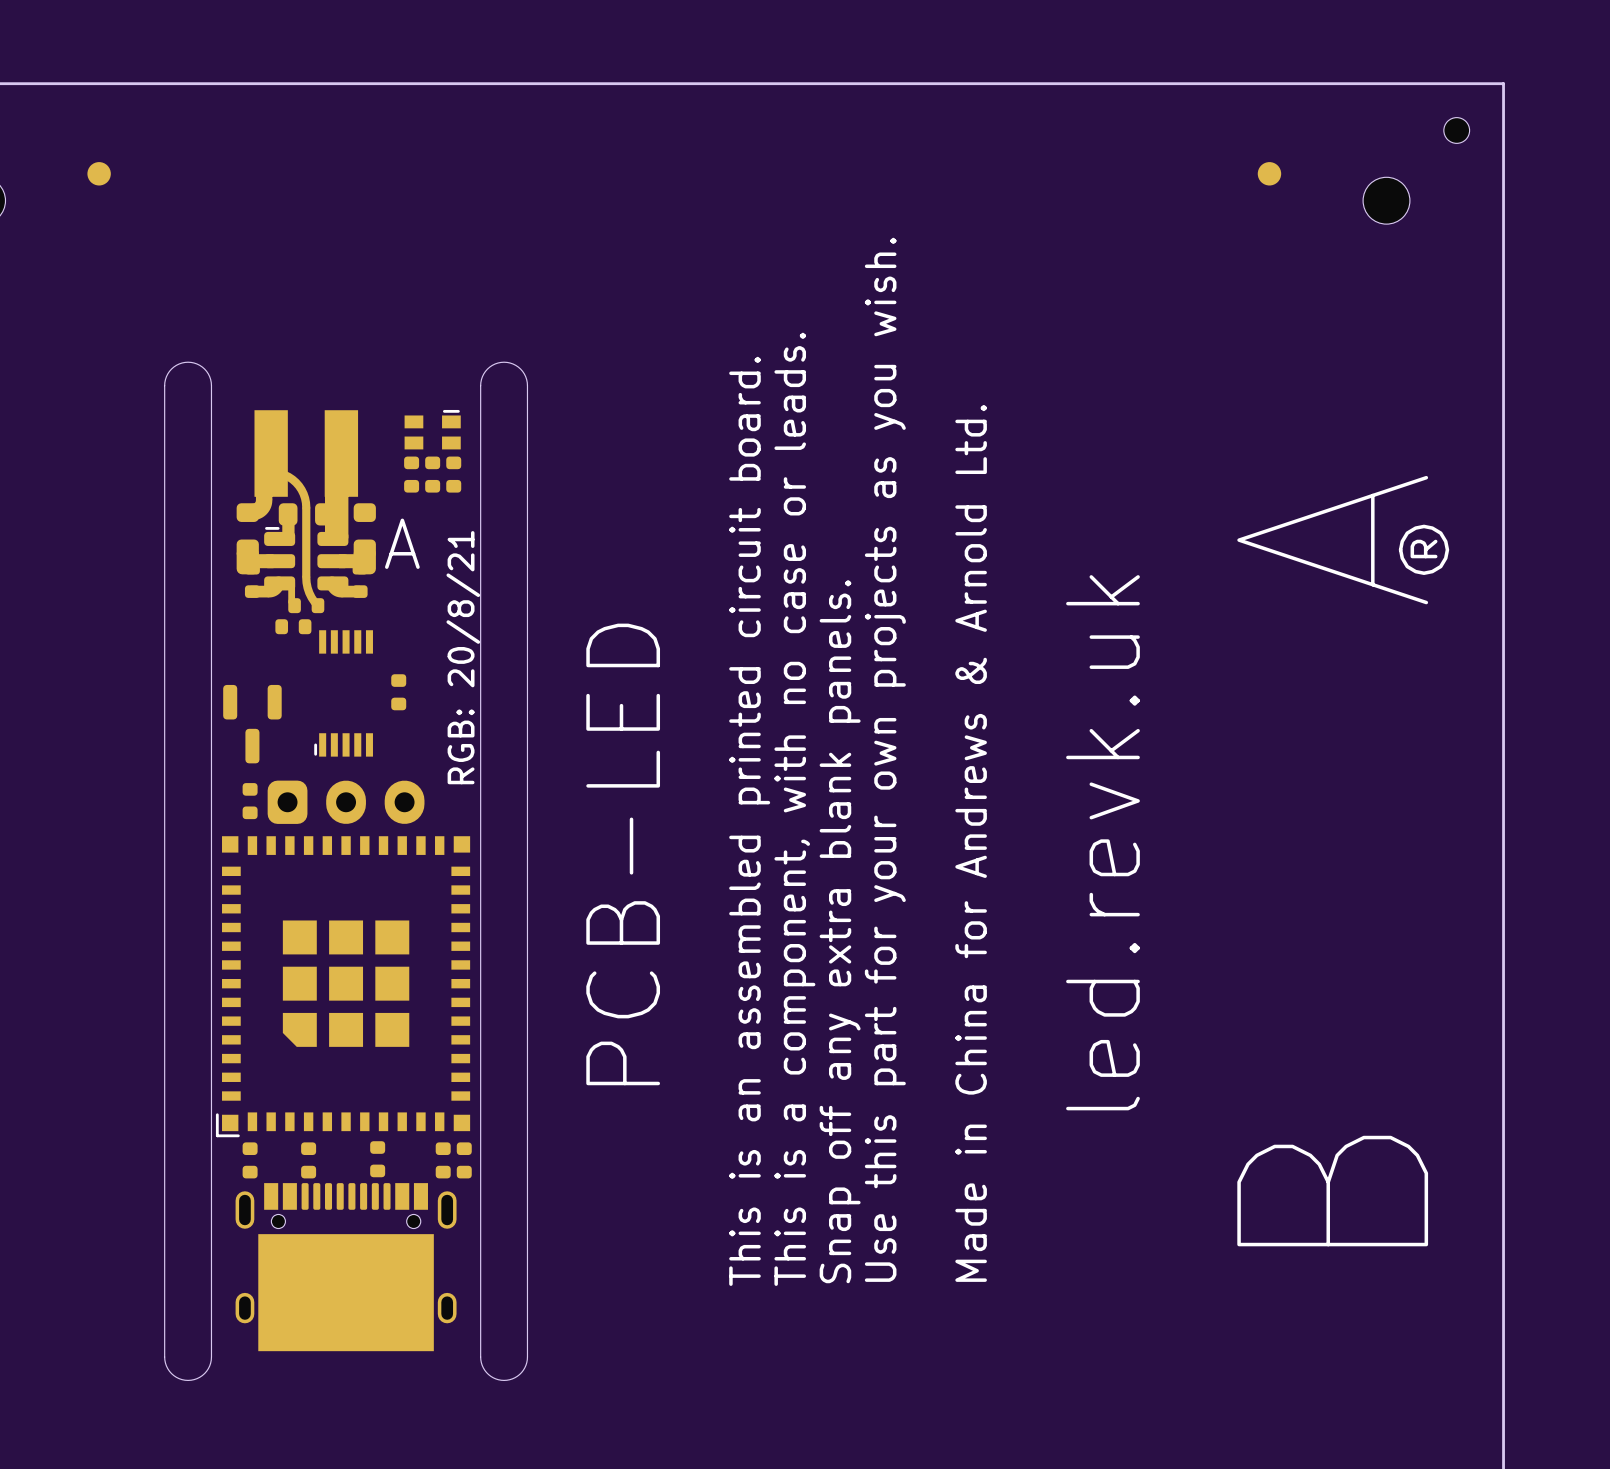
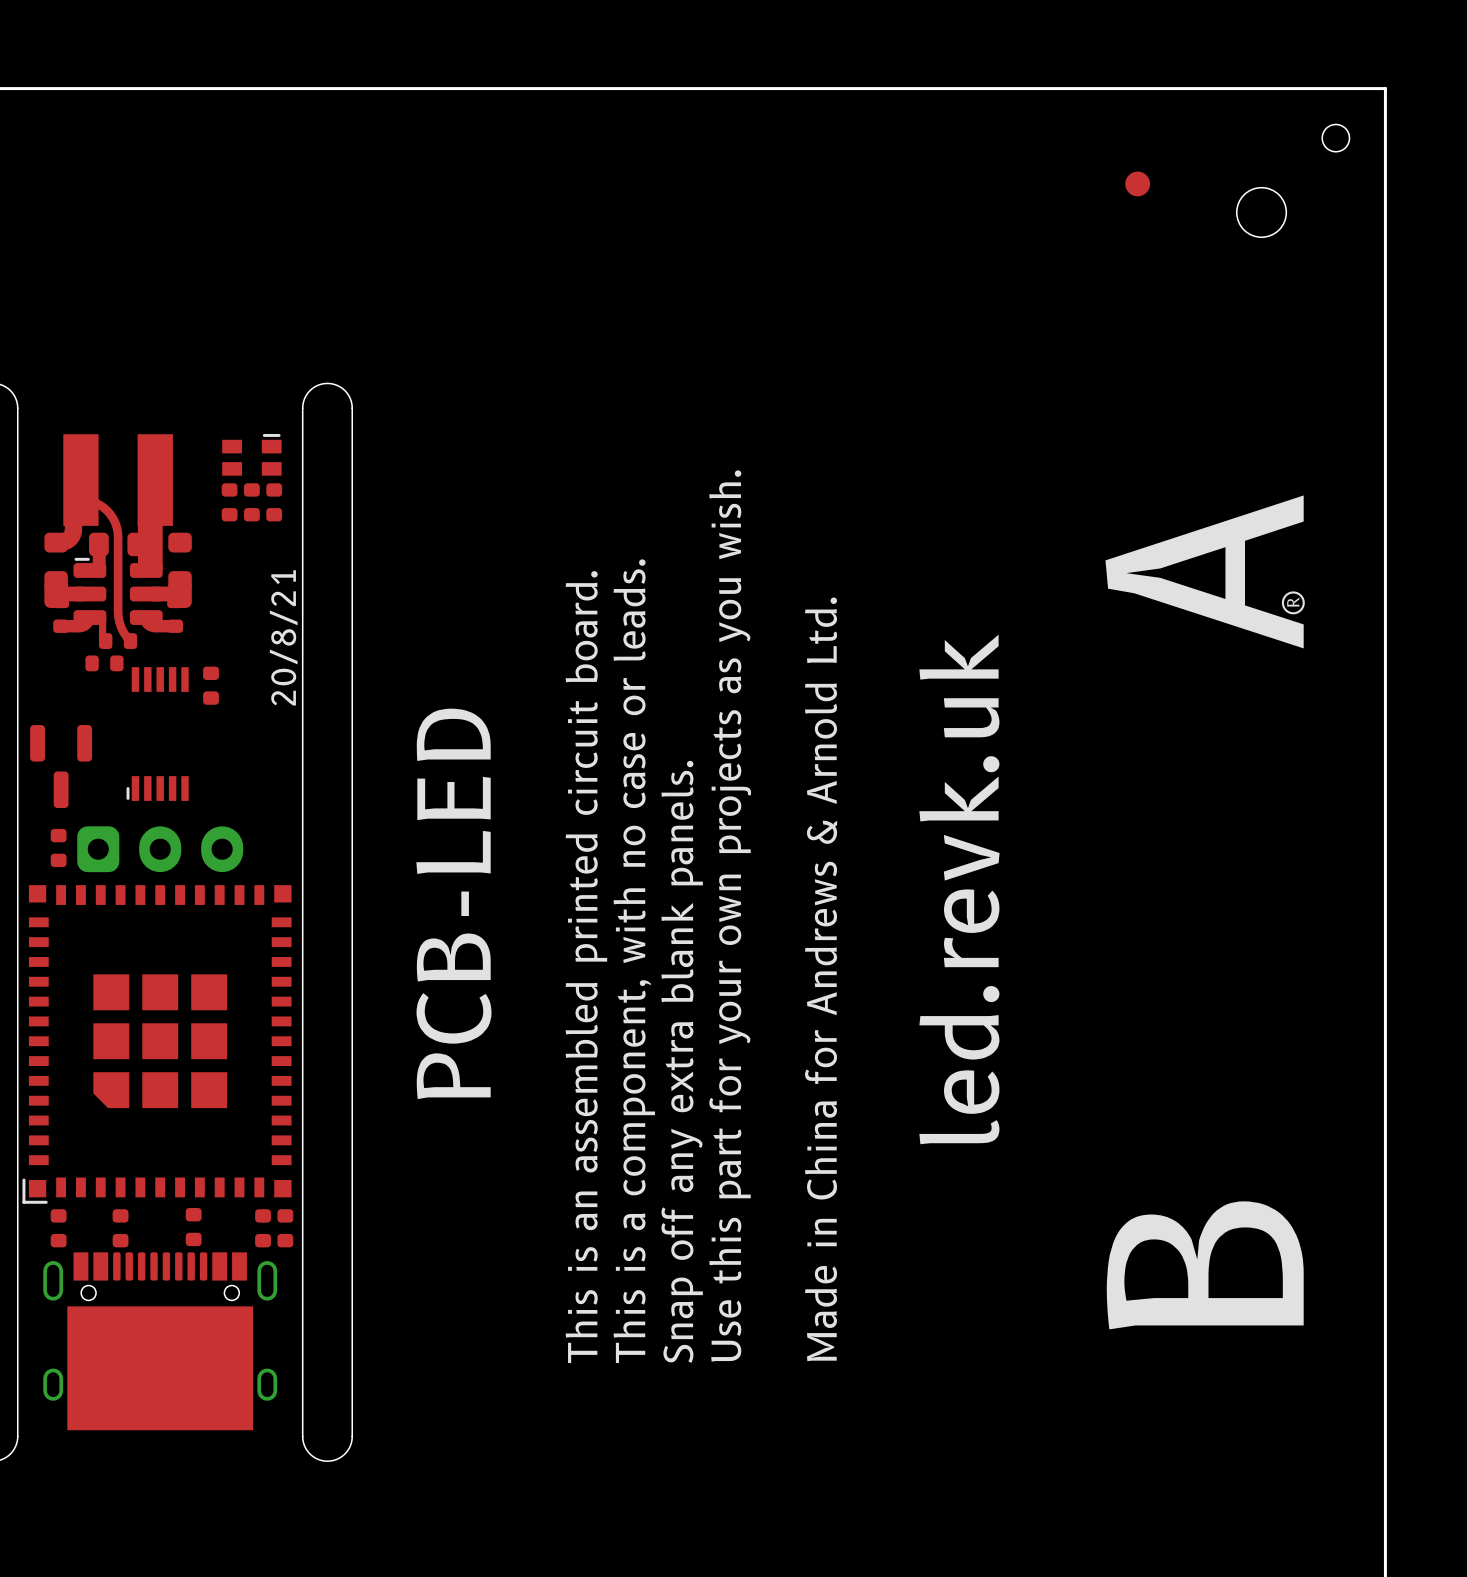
text: A (402, 543) -> none
text: RGB: 20/8/21 (463, 657) -> 20/8/21 (283, 637)
part position: (398, 692) -> (211, 685)

